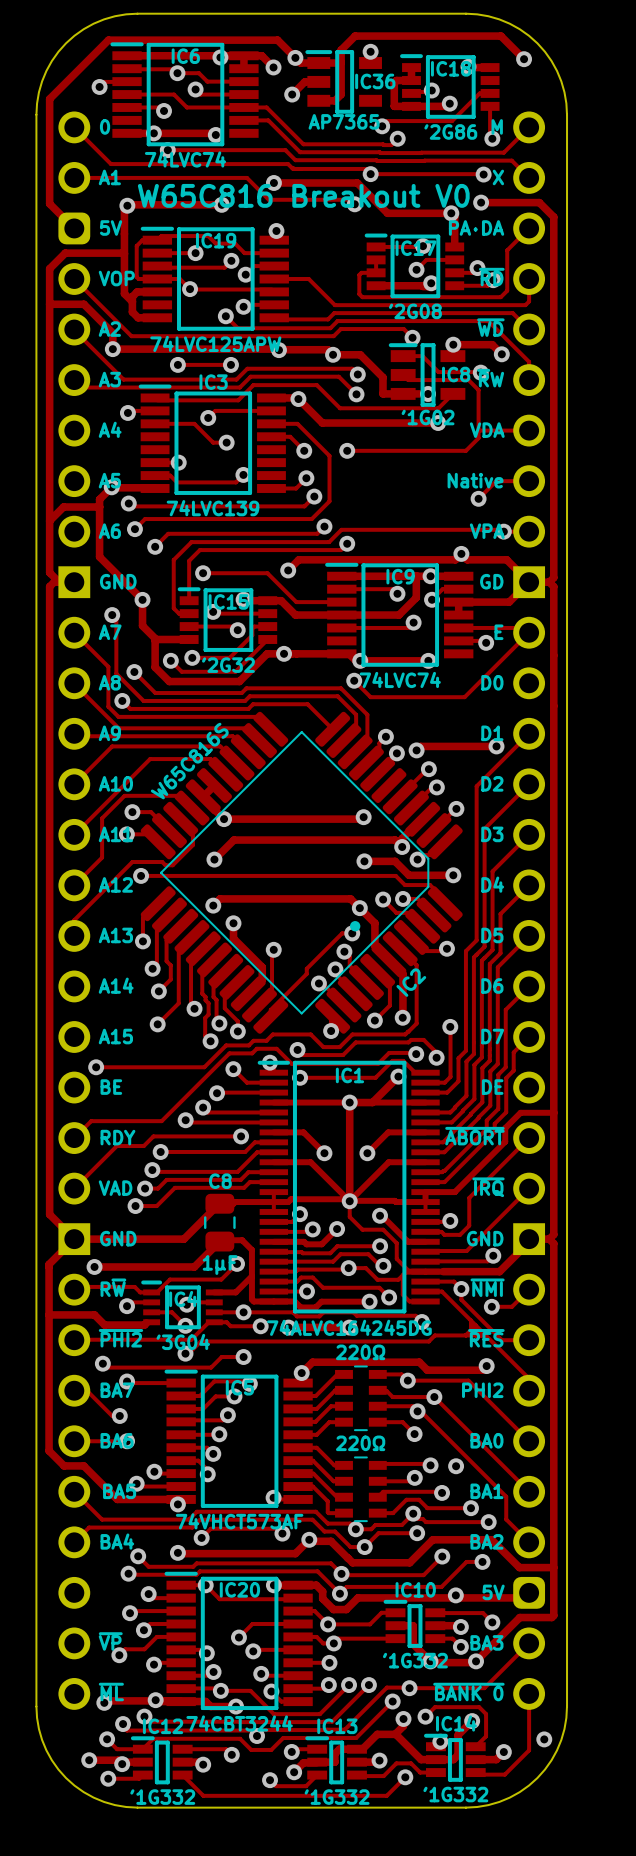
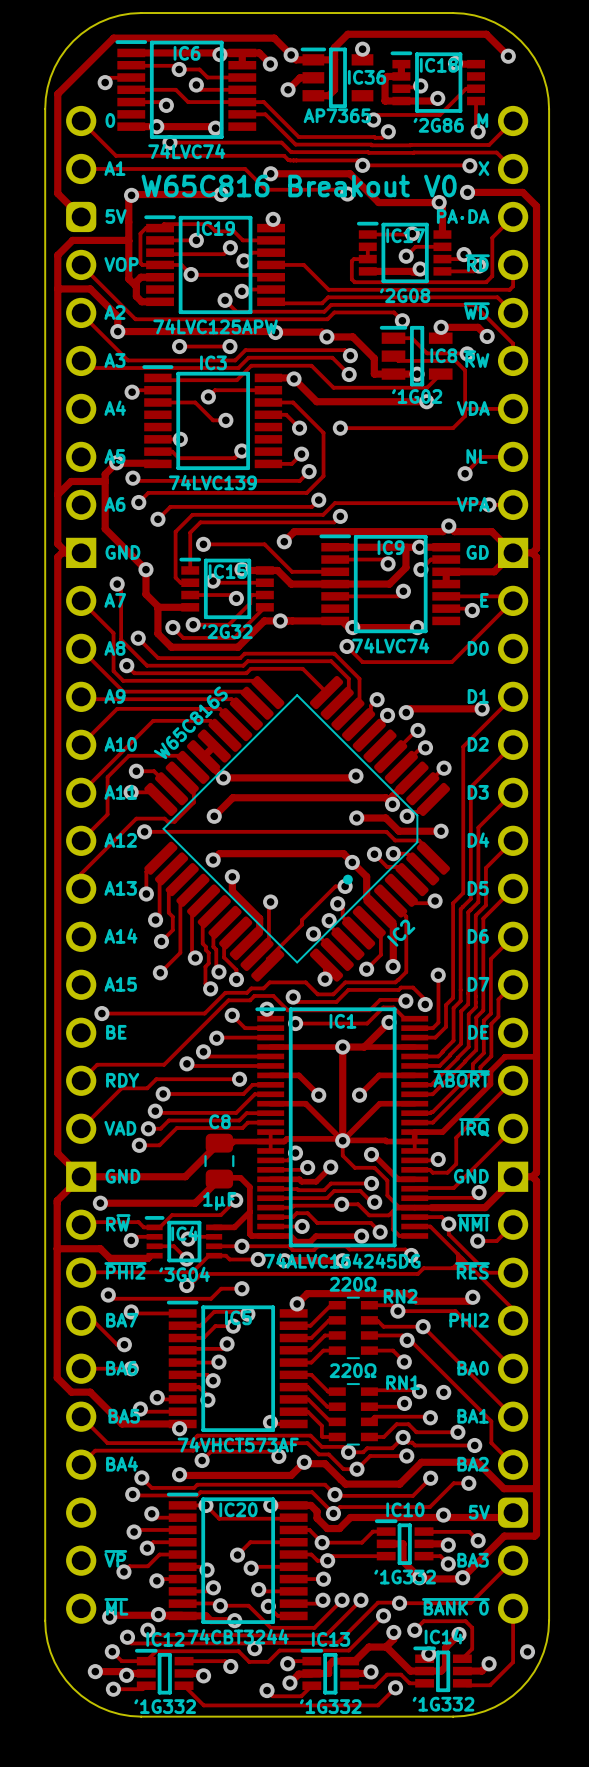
text: Native (475, 480) -> NL (476, 456)
RN2 name: none -> RN2 (400, 1296)
RN1 name: none -> RN1 (403, 1382)

